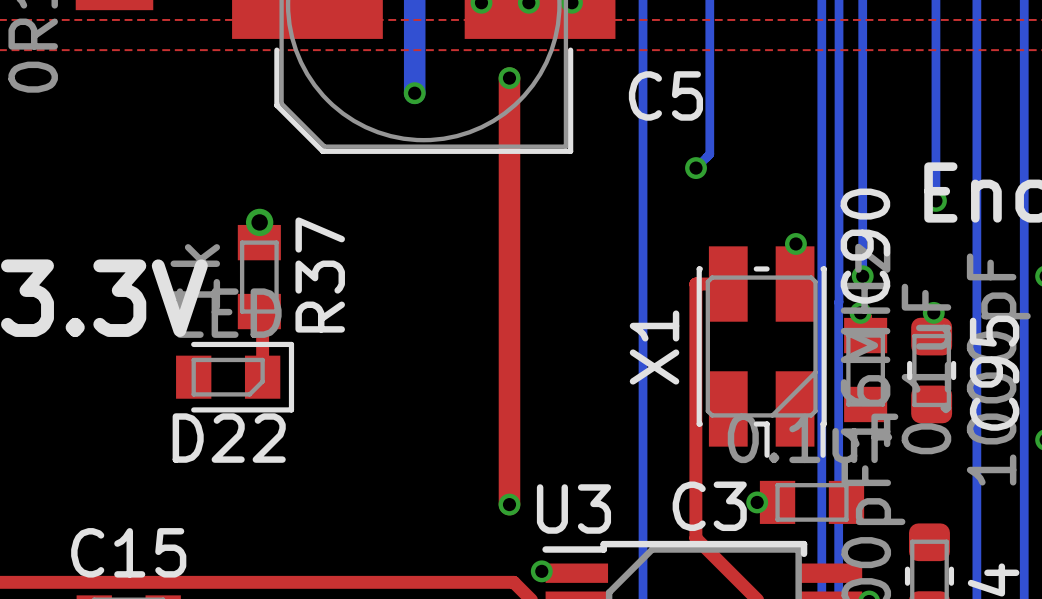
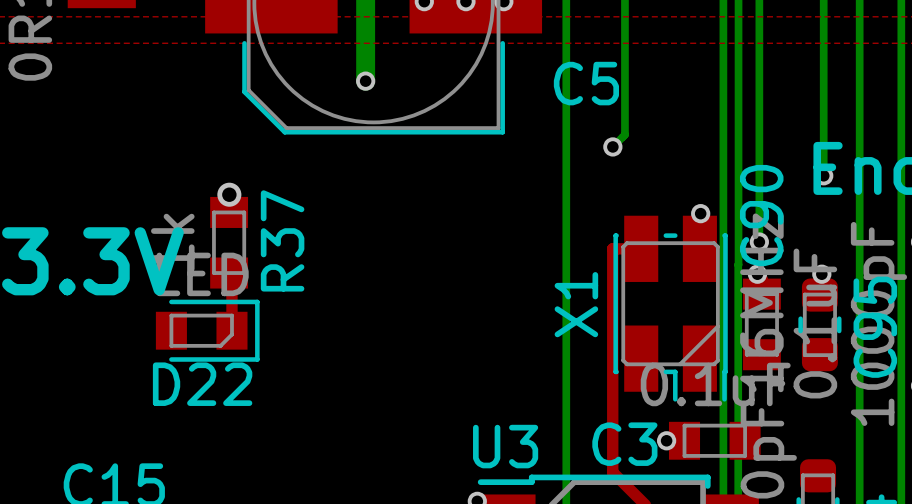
top track: (509, 78) (509, 504) -> none
via: (509, 78) -> none
via: (509, 504) -> none

